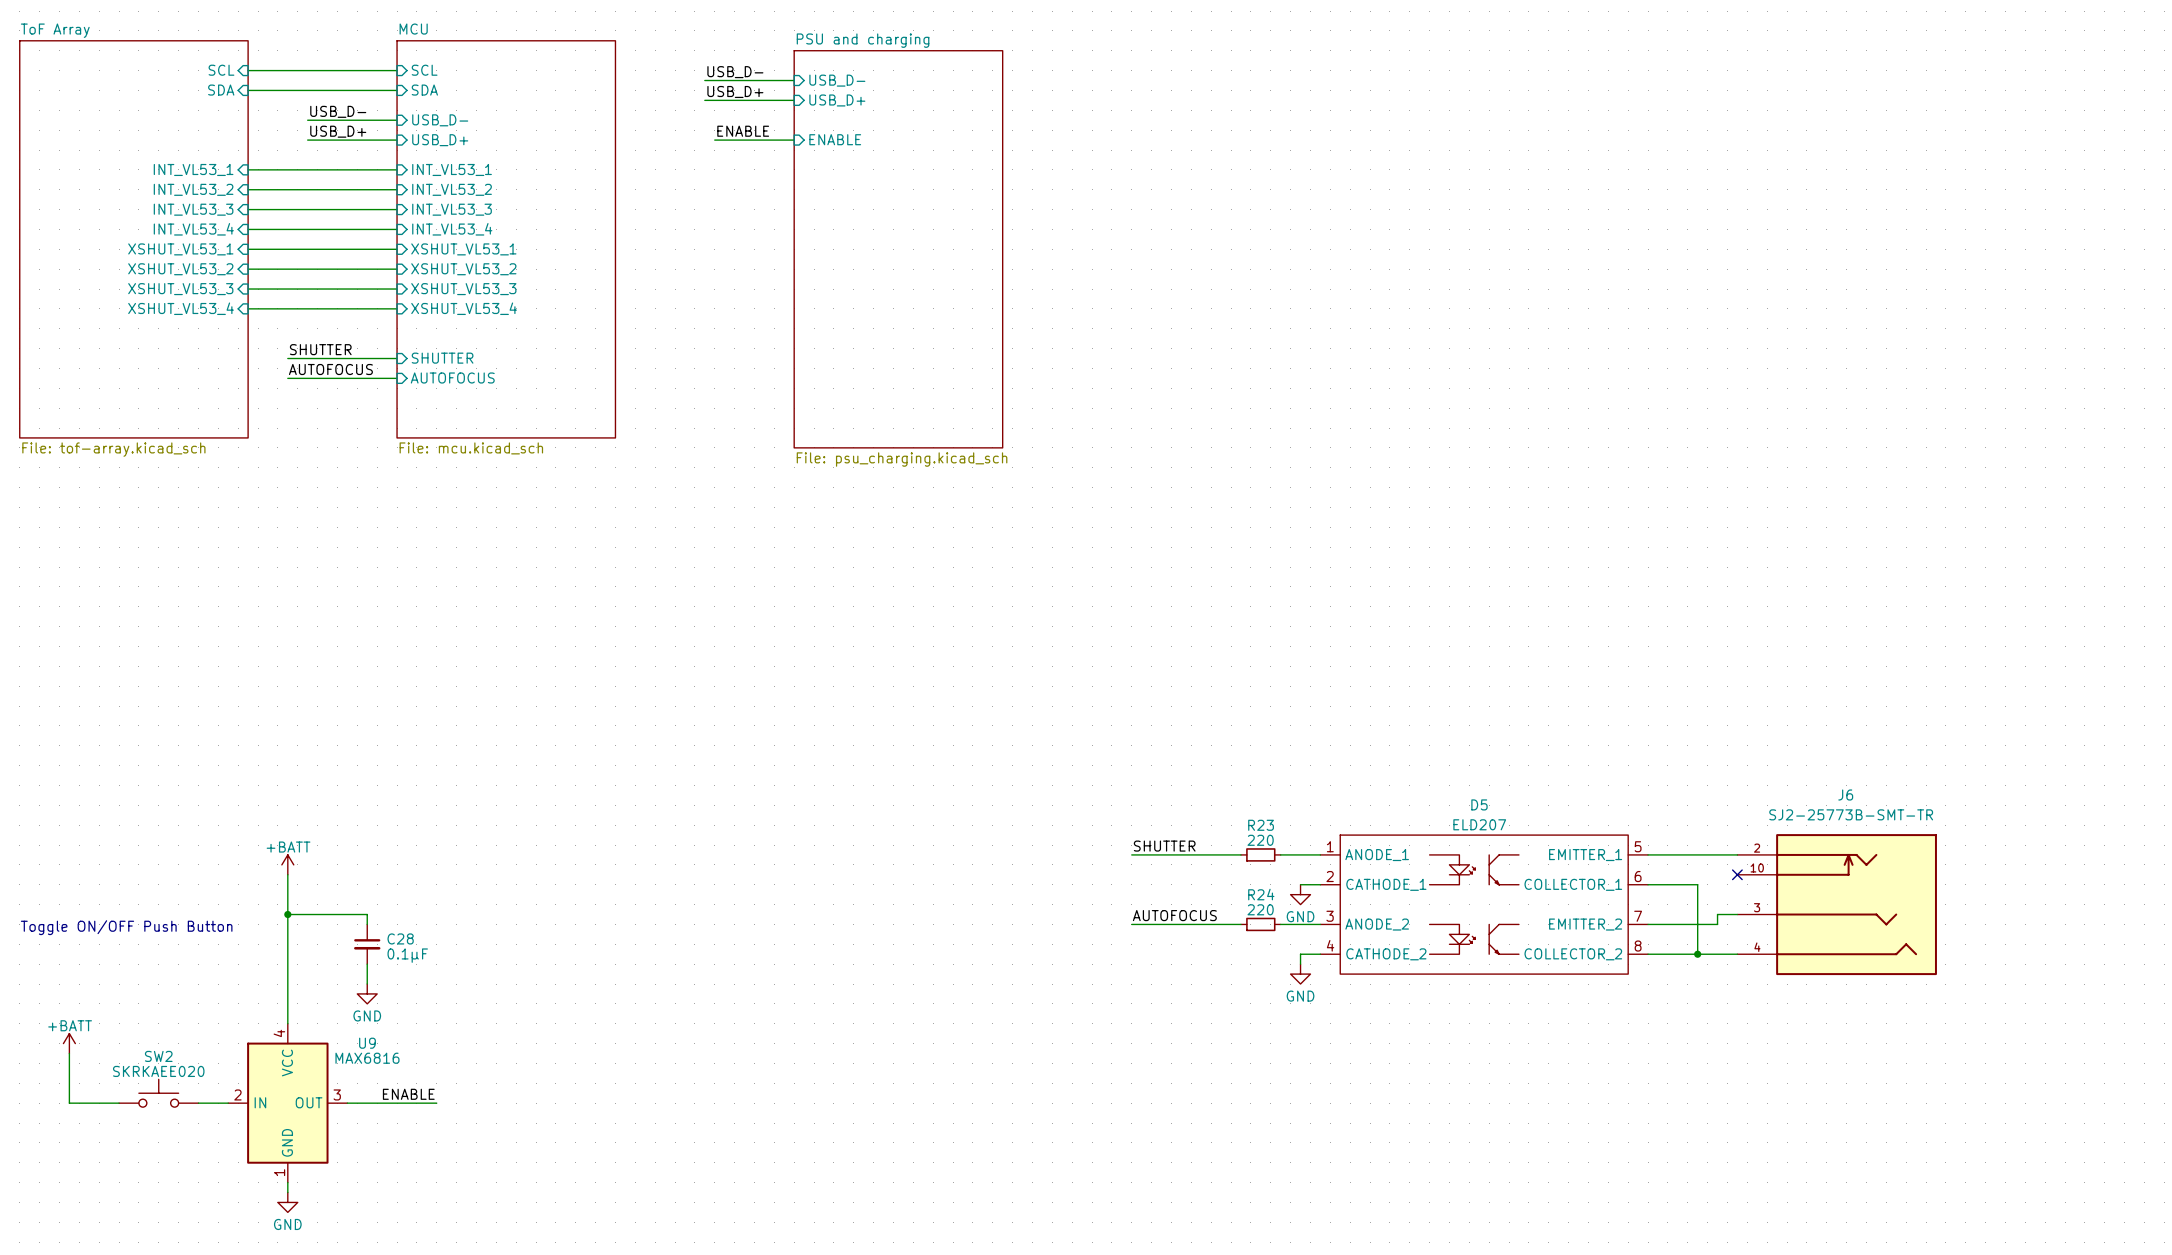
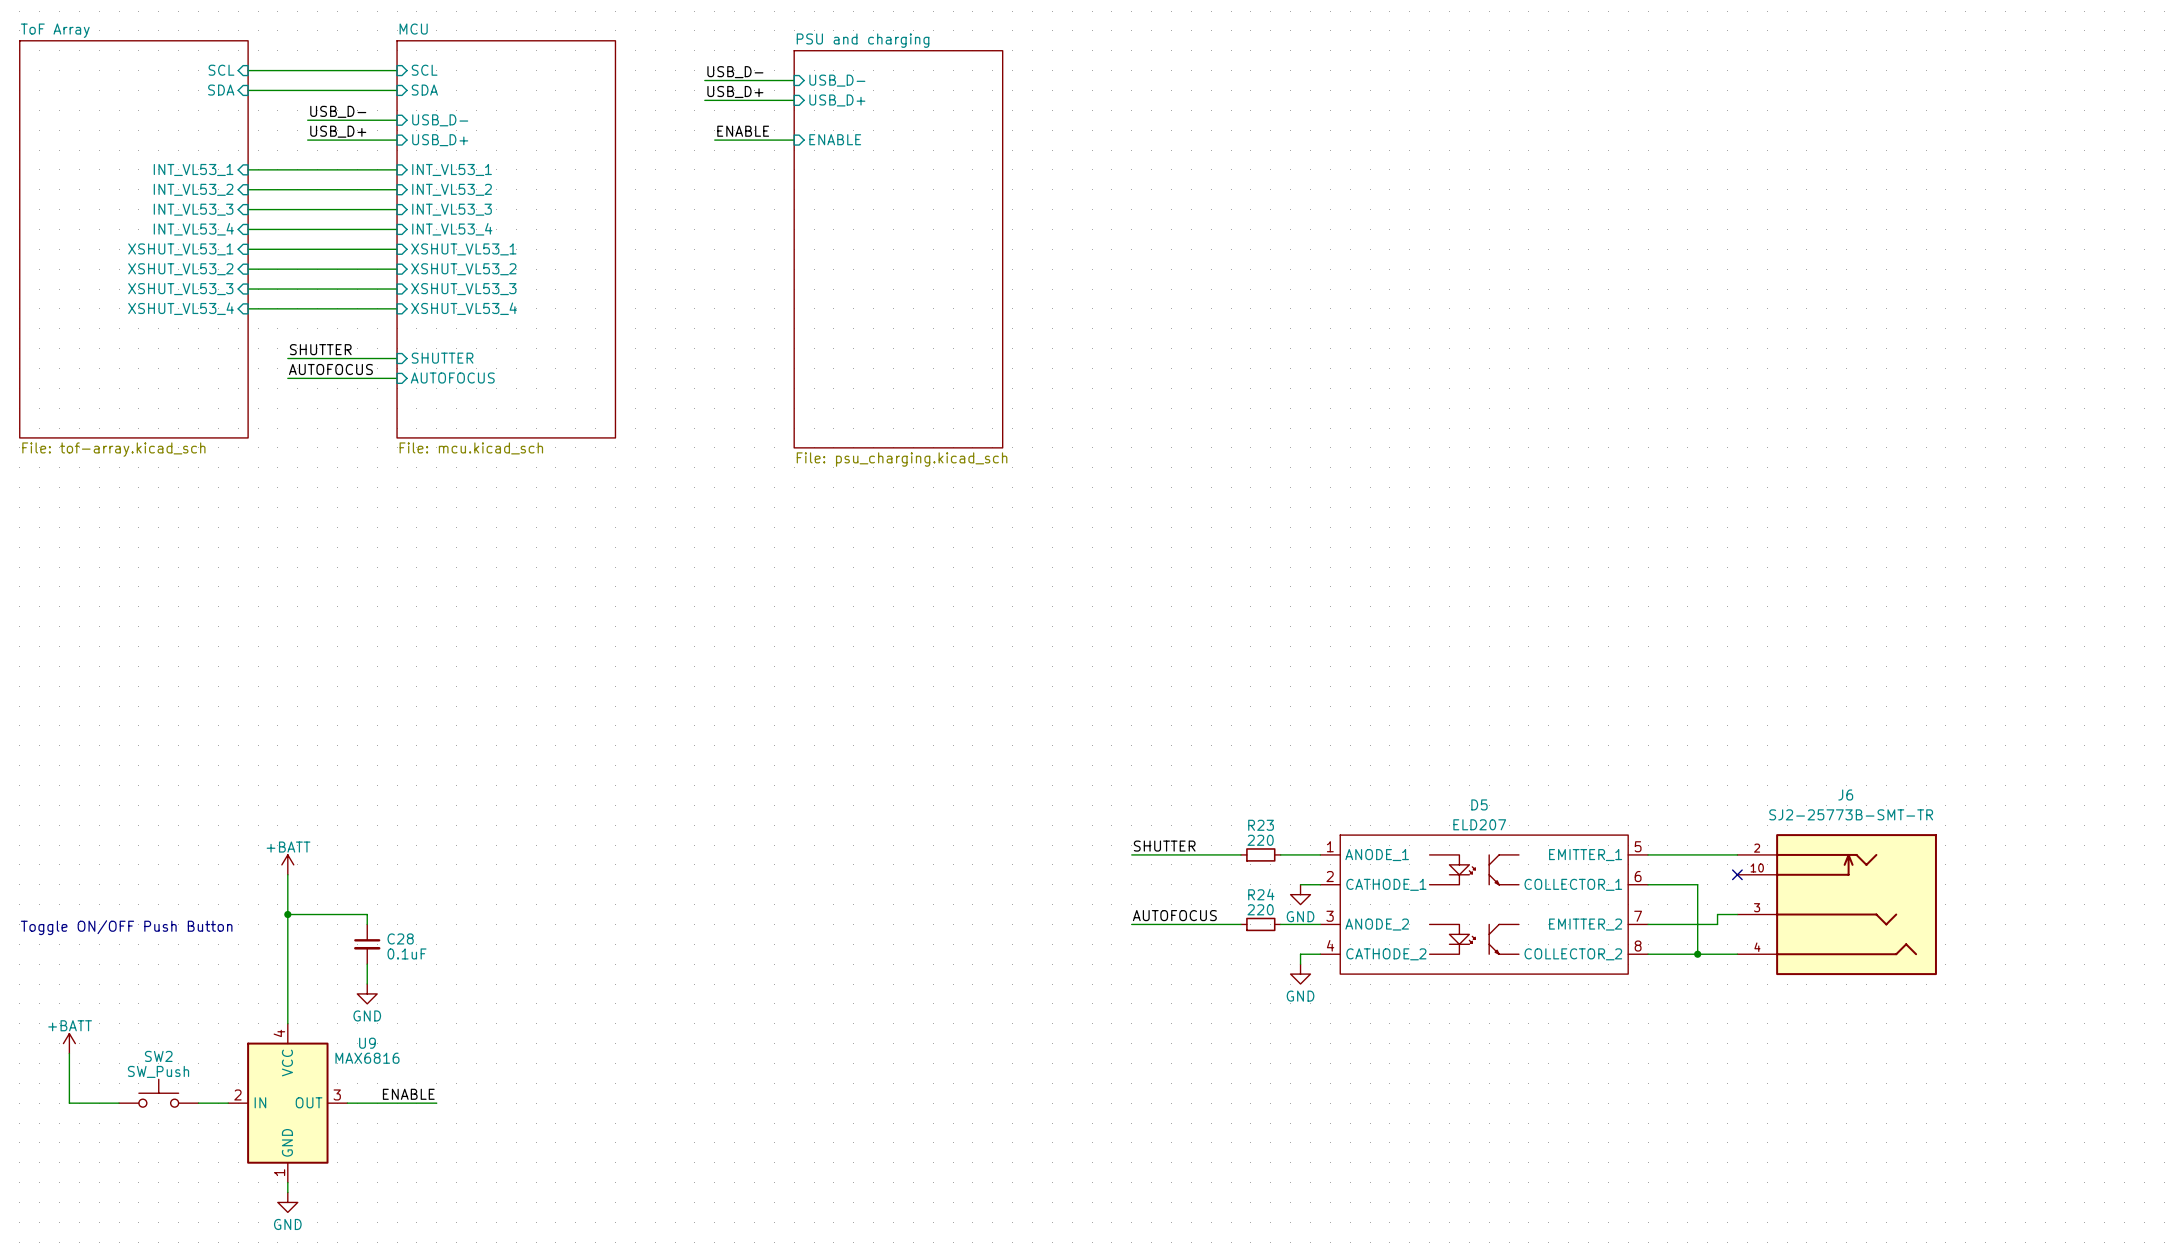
C28 value: 0.1µF (407, 955) -> 0.1uF (407, 953)
SW2 value: SKRKAEE020 (158, 1071) -> SW_Push (158, 1071)

